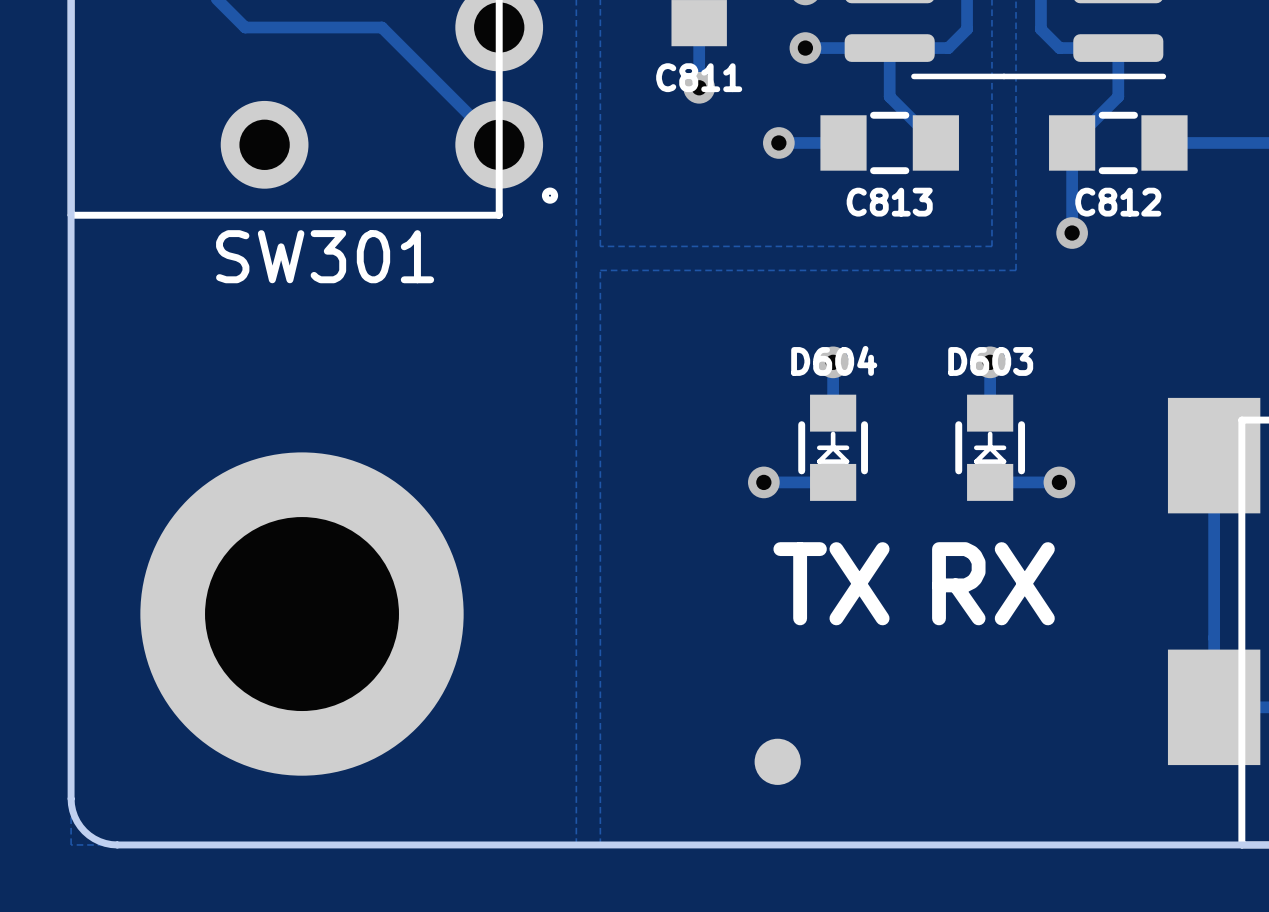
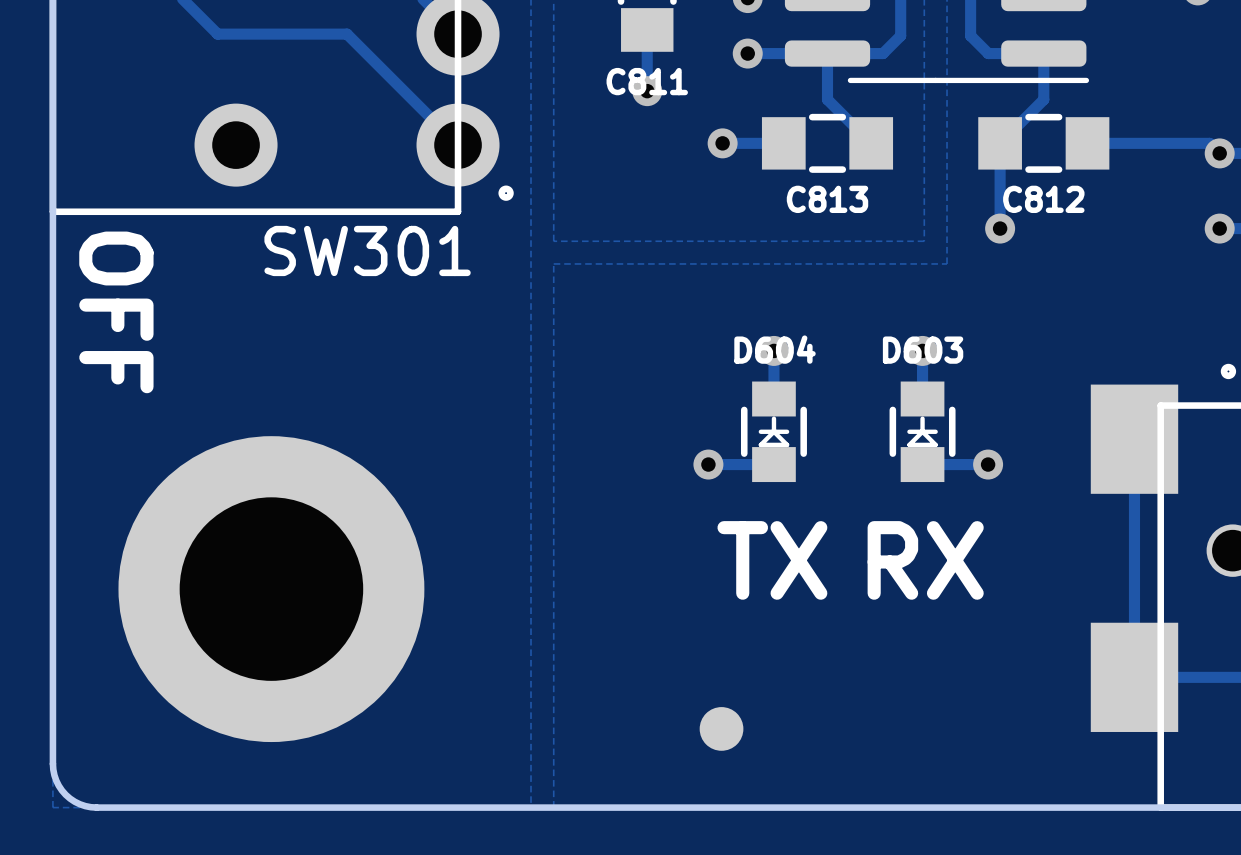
SW301 name position: SW301 (325, 256) -> SW301 (367, 250)
text: none -> OFF (116, 312)

